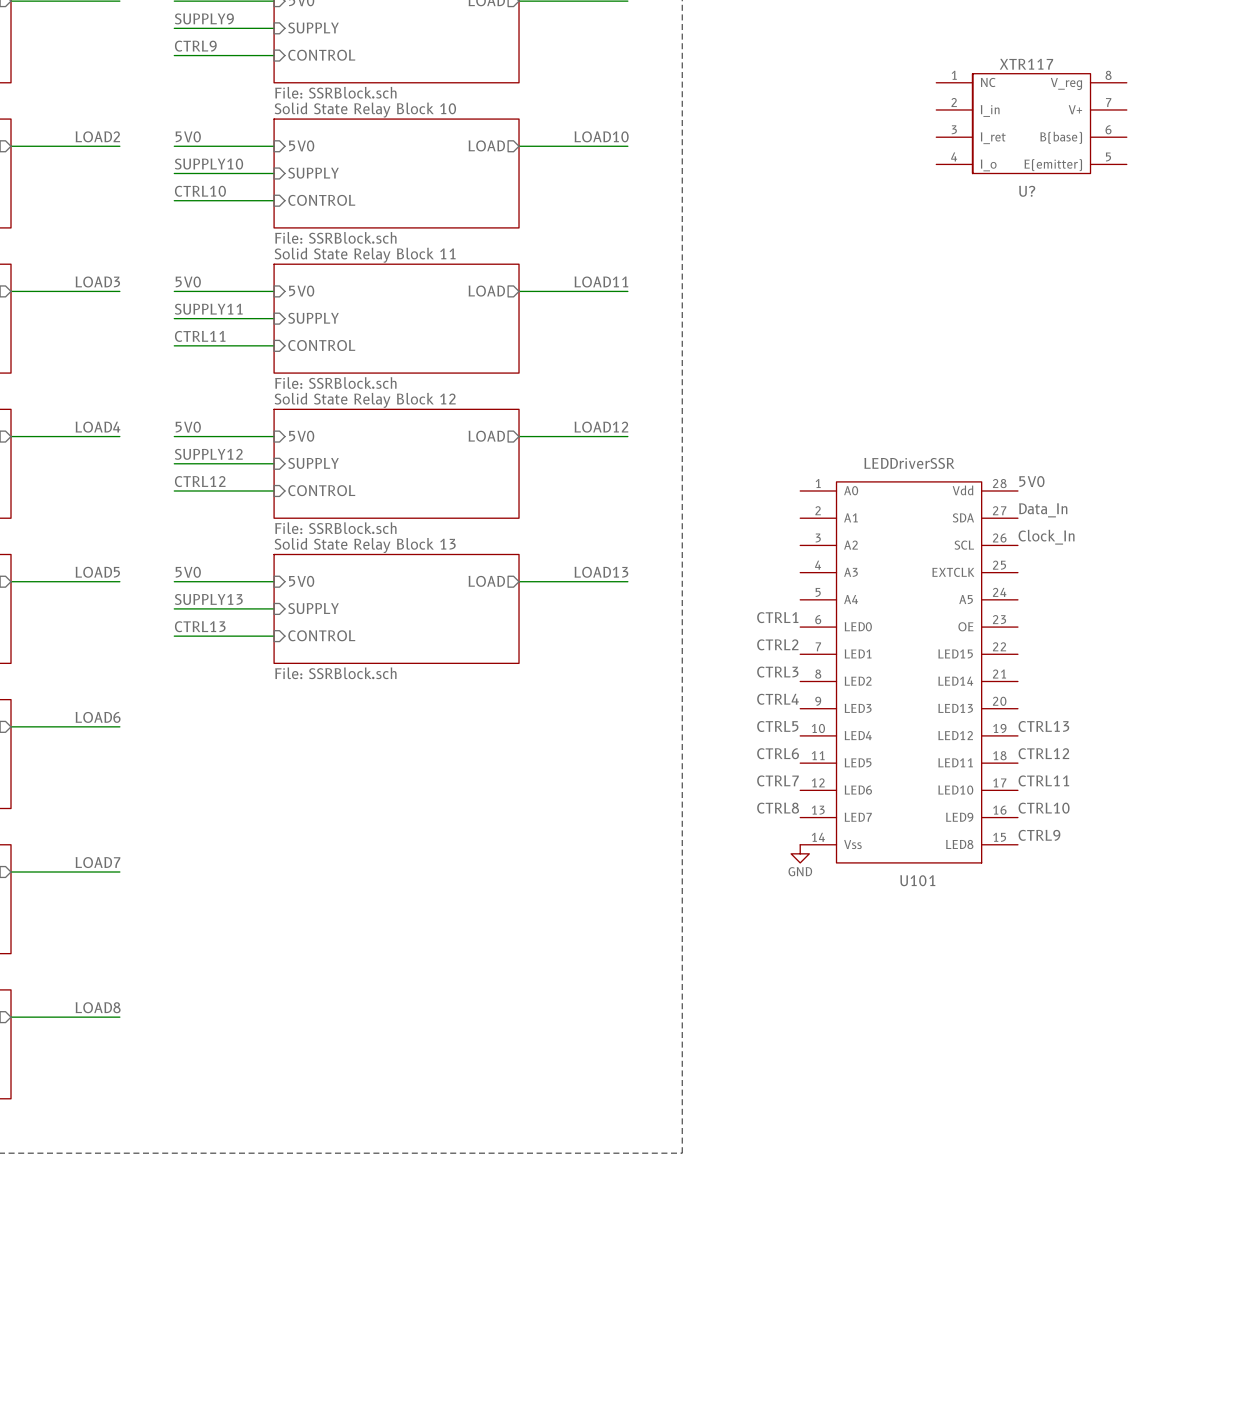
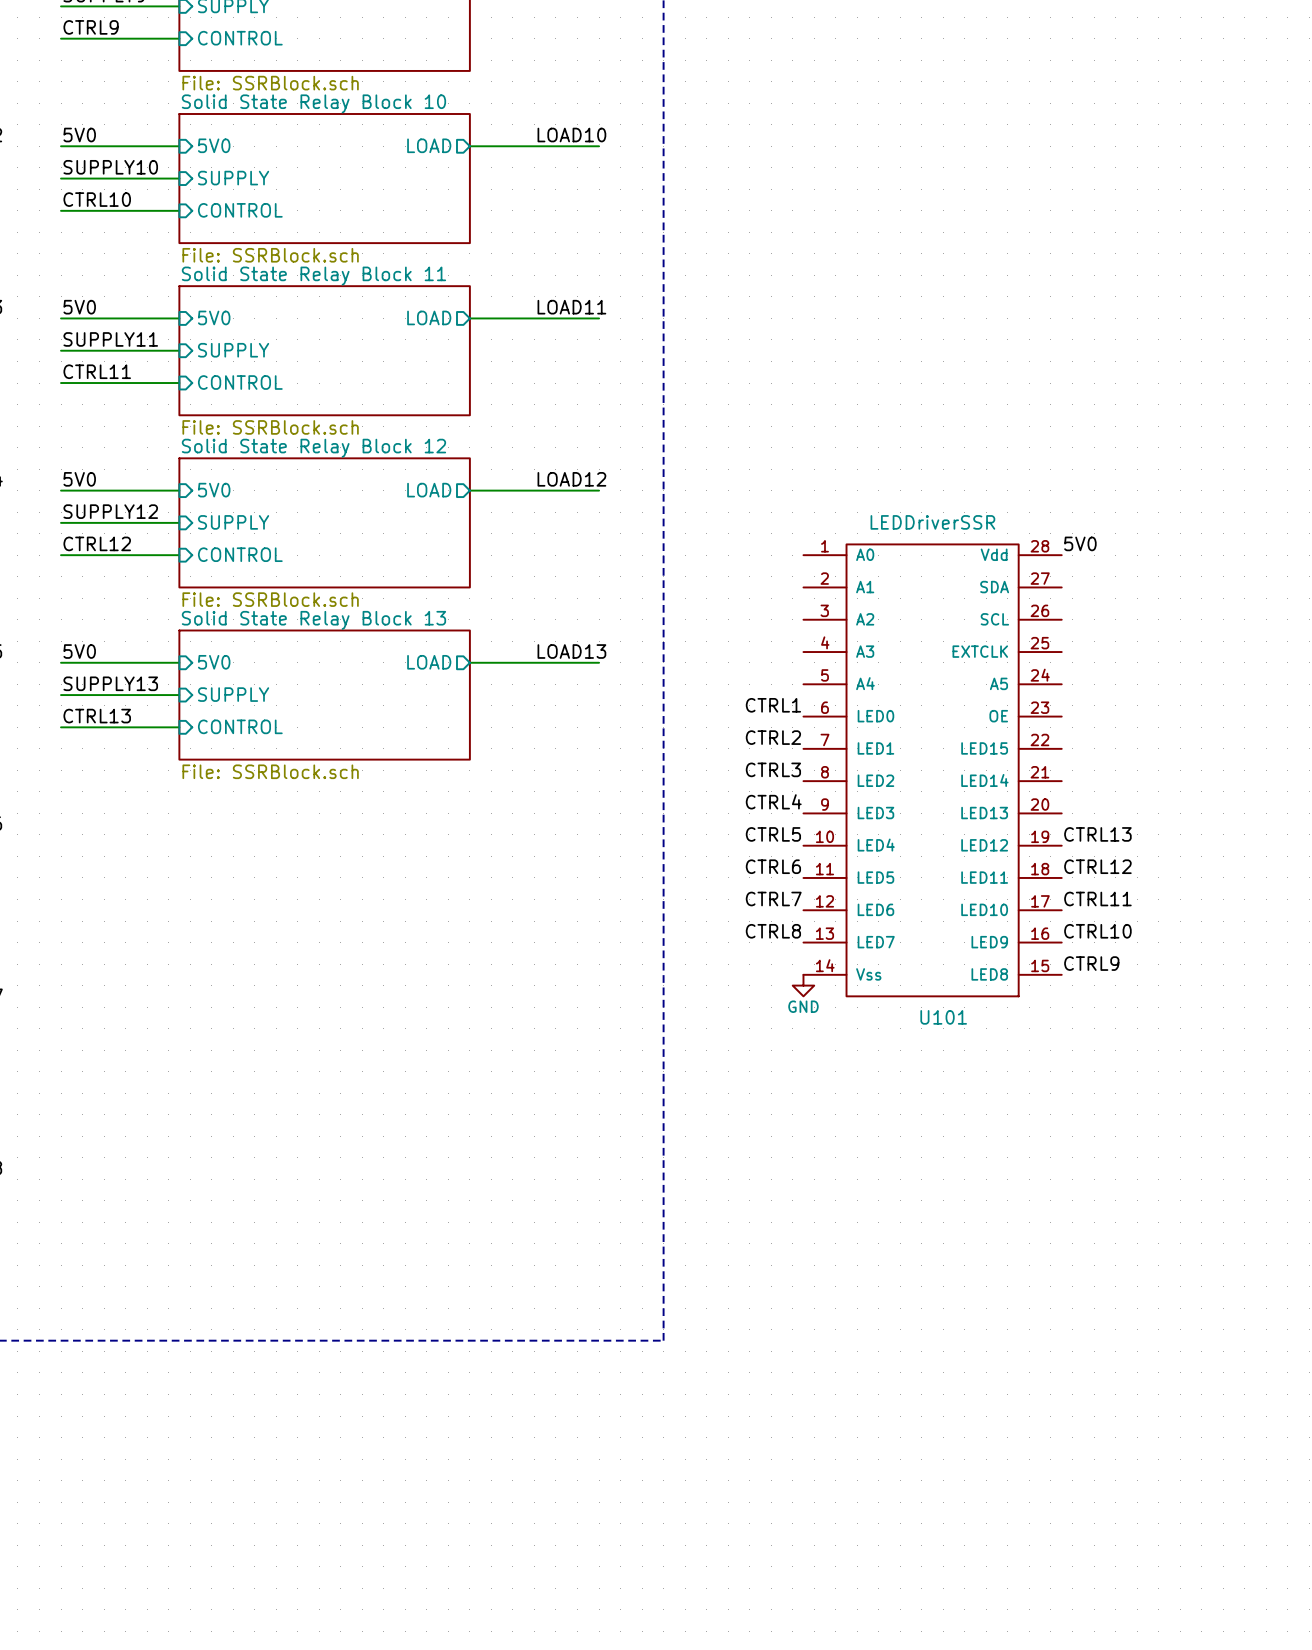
U?: XTR117 (1031, 123) -> none
label: Data_In (1043, 510) -> none
label: Clock_In (1046, 537) -> none

